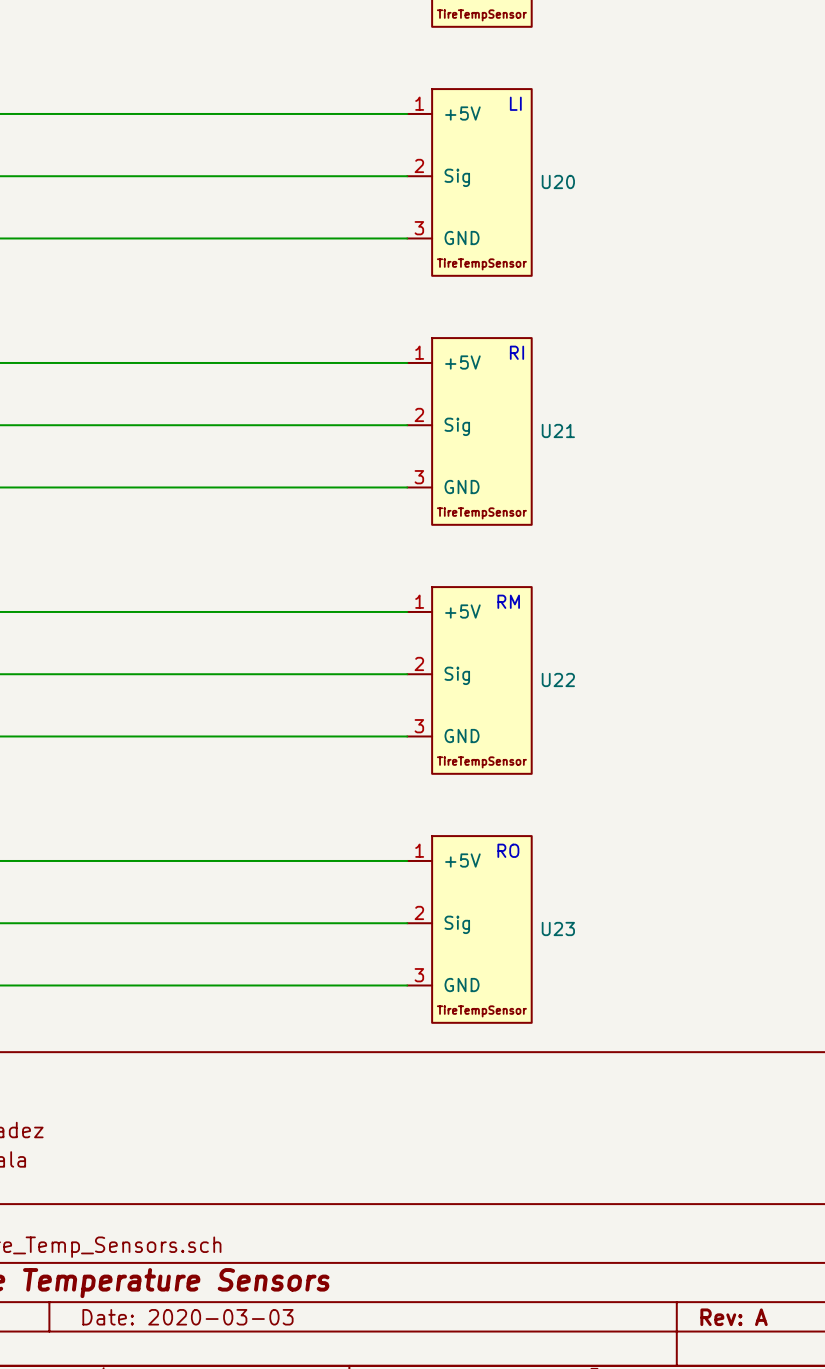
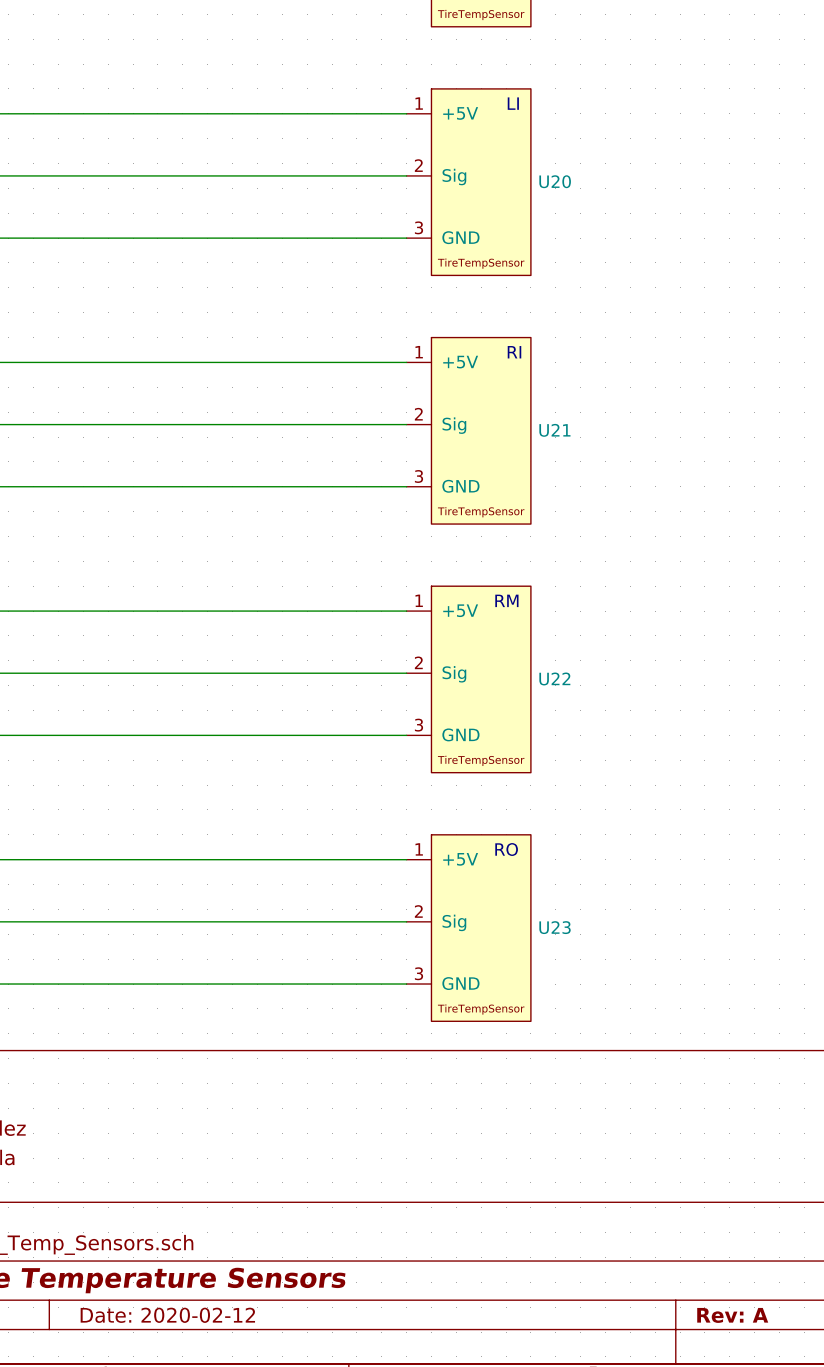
title block: Date: 2020-03-03 (187, 1317) -> Date: 2020-02-12 (167, 1315)

